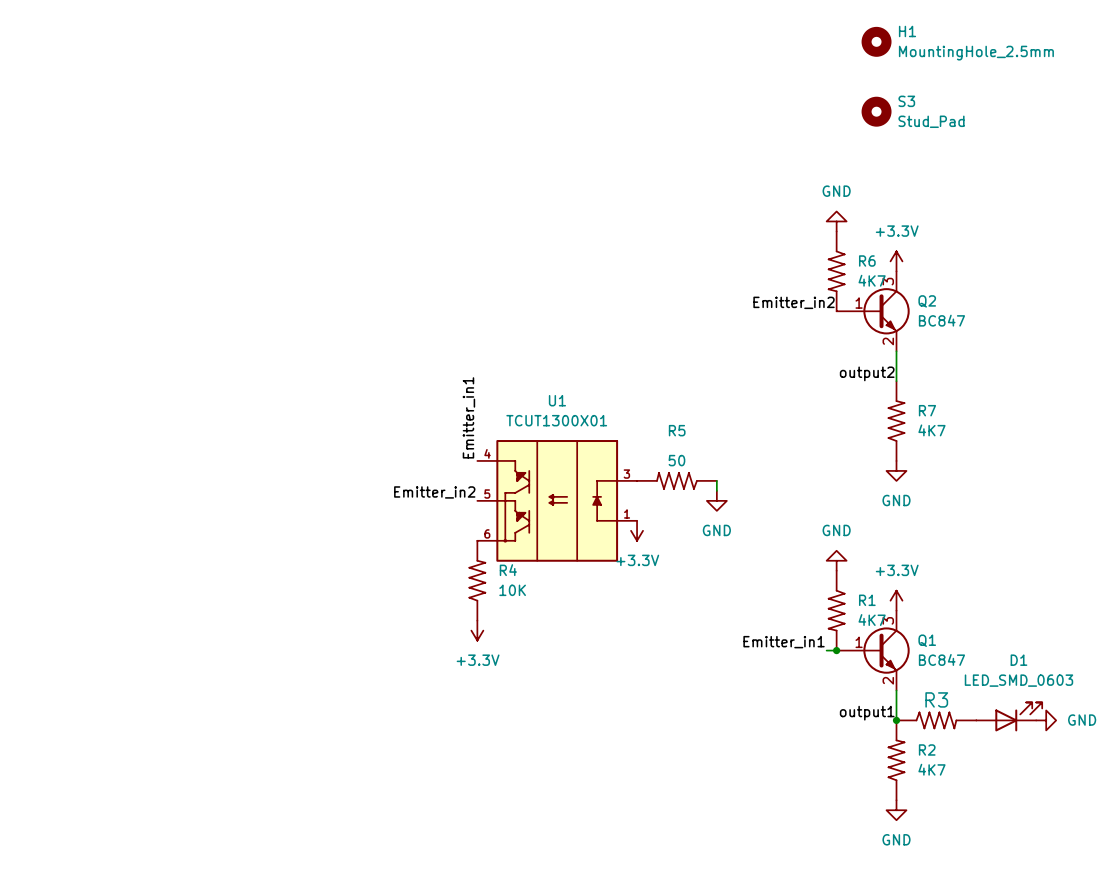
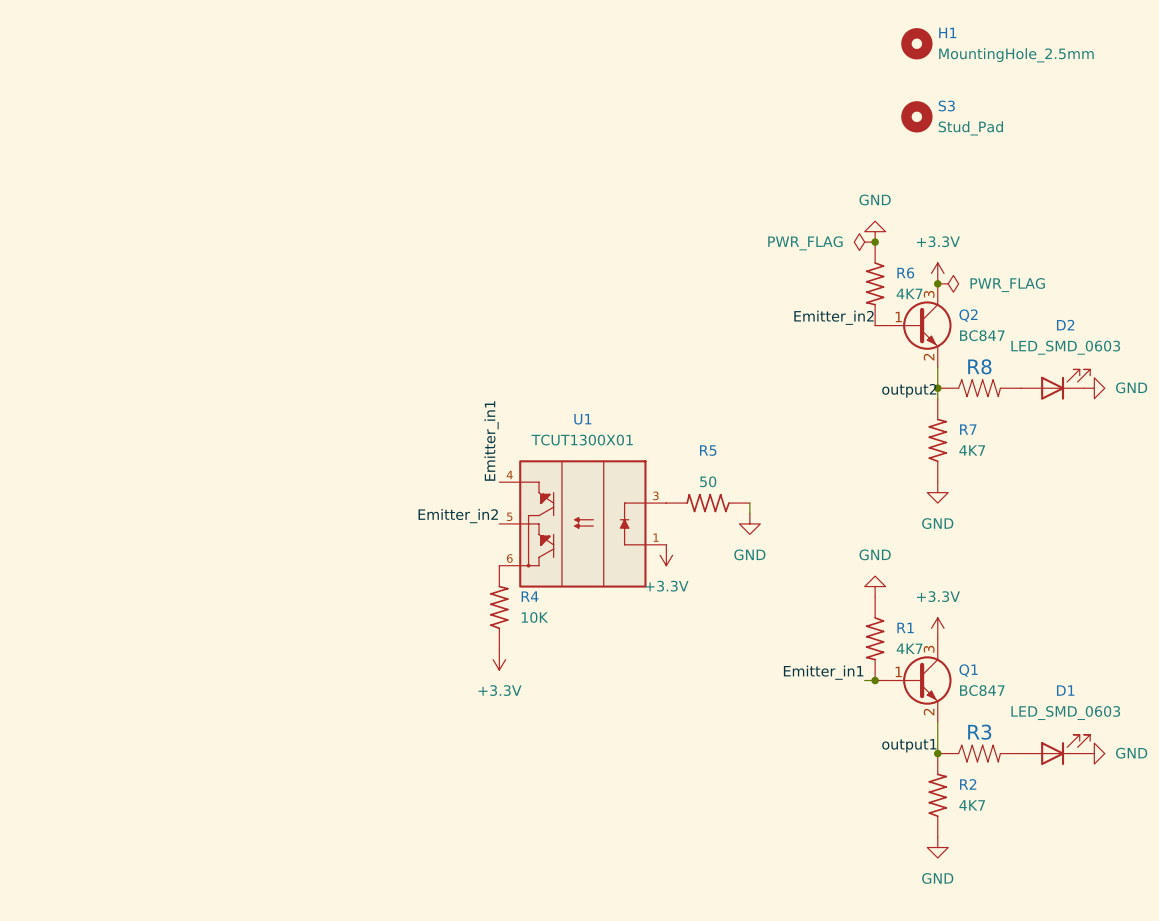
power symbol: none -> PWR_FLAG (864, 242)
junction: none -> (875, 242)
junction: none -> (937, 283)
power symbol: none -> PWR_FLAG (948, 283)
D2: none -> LED_SMD_0603 (1055, 384)
junction: none -> (937, 388)
R8: none -> (979, 388)
power symbol: none -> GND (1094, 388)

